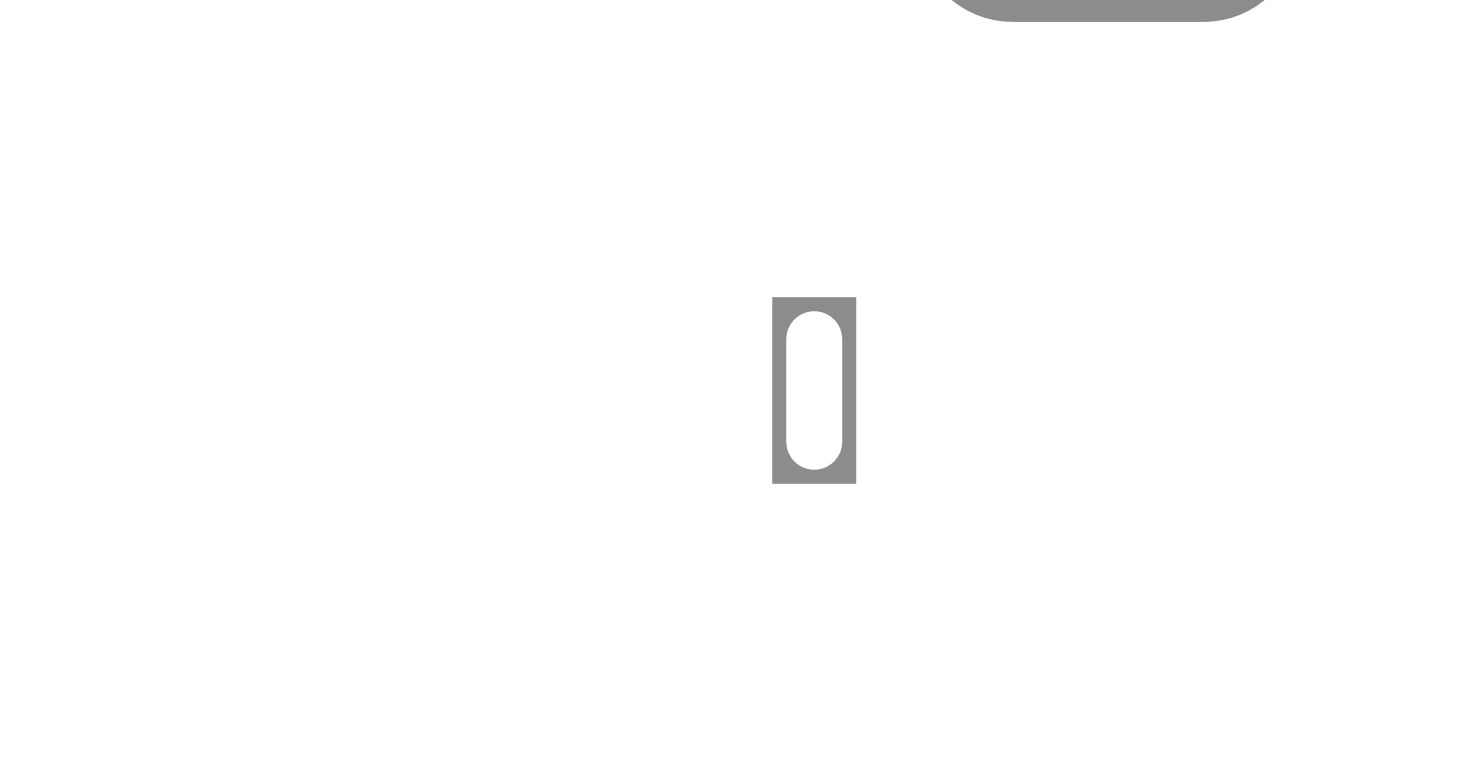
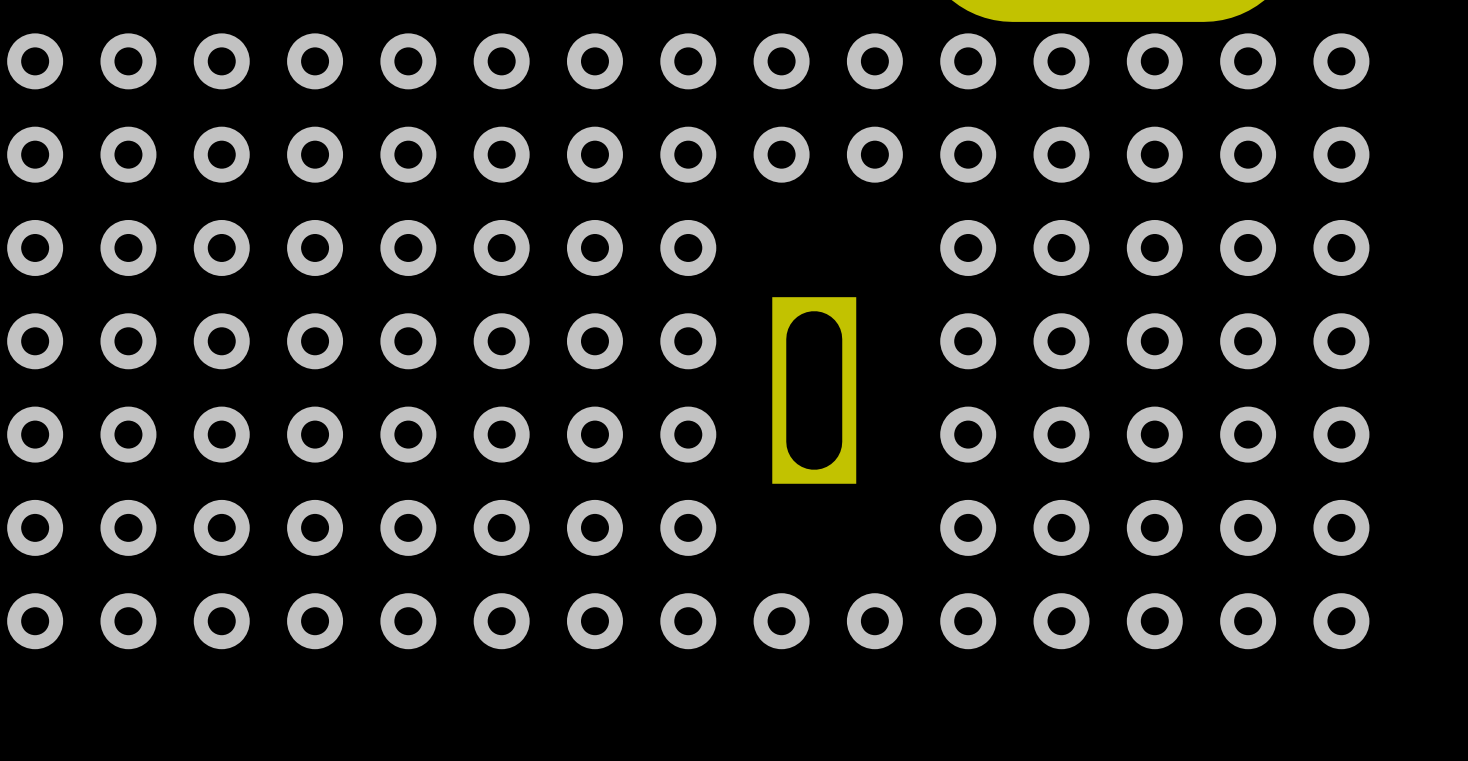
via: none -> (35, 61)
via: none -> (128, 61)
via: none -> (221, 61)
via: none -> (315, 61)
via: none -> (408, 61)
via: none -> (501, 61)
via: none -> (594, 61)
via: none -> (688, 61)
via: none -> (781, 61)
via: none -> (874, 61)
via: none -> (968, 61)
via: none -> (1061, 61)
via: none -> (1154, 61)
via: none -> (1248, 61)
via: none -> (1341, 61)
via: none -> (35, 154)
via: none -> (128, 154)
via: none -> (221, 154)
via: none -> (315, 154)
via: none -> (408, 154)
via: none -> (501, 154)
via: none -> (594, 154)
via: none -> (688, 154)
via: none -> (781, 154)
via: none -> (874, 154)
via: none -> (968, 154)
via: none -> (1061, 154)
via: none -> (1154, 154)
via: none -> (1248, 154)
via: none -> (1341, 154)
via: none -> (35, 247)
via: none -> (128, 247)
via: none -> (221, 247)
via: none -> (315, 247)
via: none -> (408, 247)
via: none -> (501, 247)
via: none -> (594, 247)
via: none -> (688, 247)
via: none -> (968, 247)
via: none -> (1061, 247)
via: none -> (1154, 247)
via: none -> (1248, 247)
via: none -> (1341, 247)
via: none -> (35, 341)
via: none -> (128, 341)
via: none -> (221, 341)
via: none -> (315, 341)
via: none -> (408, 341)
via: none -> (501, 341)
via: none -> (594, 341)
via: none -> (688, 341)
via: none -> (968, 341)
via: none -> (1061, 341)
via: none -> (1154, 341)
via: none -> (1248, 341)
via: none -> (1341, 341)
via: none -> (35, 434)
via: none -> (128, 434)
via: none -> (221, 434)
via: none -> (315, 434)
via: none -> (408, 434)
via: none -> (501, 434)
via: none -> (594, 434)
via: none -> (688, 434)
via: none -> (968, 434)
via: none -> (1061, 434)
via: none -> (1154, 434)
via: none -> (1248, 434)
via: none -> (1341, 434)
via: none -> (35, 527)
via: none -> (128, 527)
via: none -> (221, 527)
via: none -> (315, 527)
via: none -> (408, 527)
via: none -> (501, 527)
via: none -> (594, 527)
via: none -> (688, 527)
via: none -> (968, 527)
via: none -> (1061, 527)
via: none -> (1154, 527)
via: none -> (1248, 527)
via: none -> (1341, 527)
via: none -> (35, 621)
via: none -> (128, 621)
via: none -> (221, 621)
via: none -> (315, 621)
via: none -> (408, 621)
via: none -> (501, 621)
via: none -> (594, 621)
via: none -> (688, 621)
via: none -> (781, 621)
via: none -> (874, 621)
via: none -> (968, 621)
via: none -> (1061, 621)
via: none -> (1154, 621)
via: none -> (1248, 621)
via: none -> (1341, 621)

